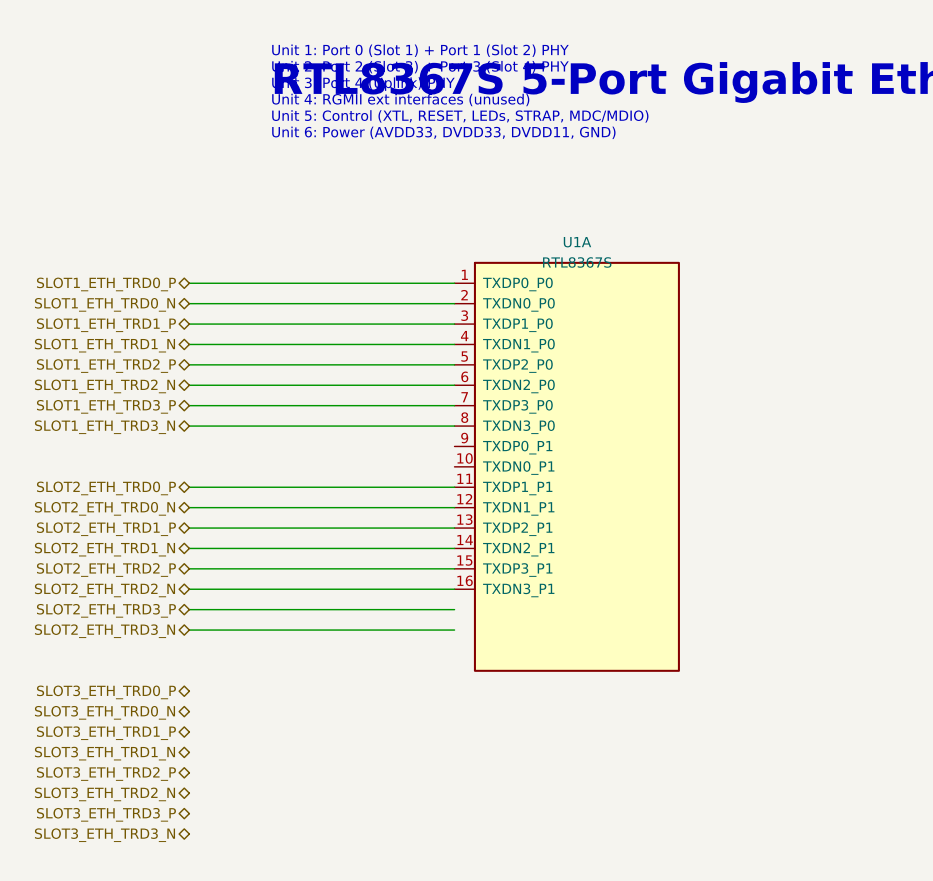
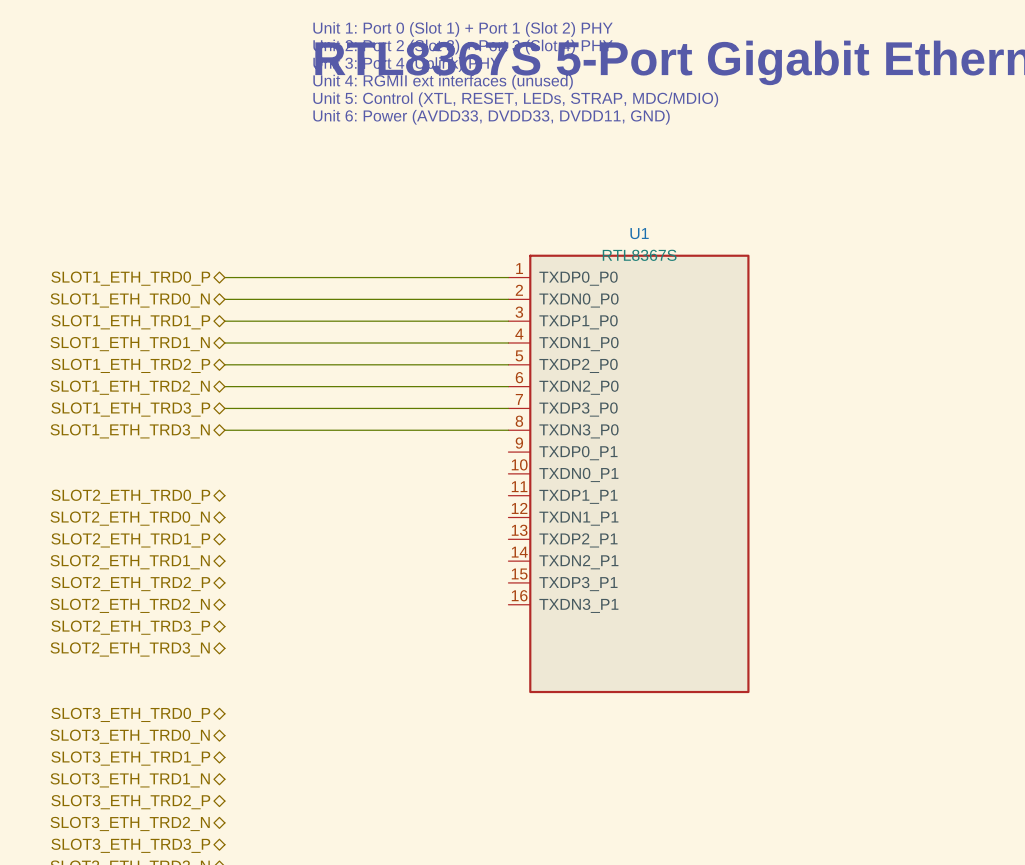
U1A name: U1A (577, 242) -> U1 (639, 233)
wire: (189, 487) (454, 487) -> none
wire: (189, 507) (454, 507) -> none
wire: (189, 528) (454, 528) -> none
wire: (189, 548) (454, 548) -> none
wire: (189, 568) (454, 568) -> none
wire: (189, 589) (454, 589) -> none
wire: (189, 609) (454, 609) -> none
wire: (189, 630) (454, 630) -> none

